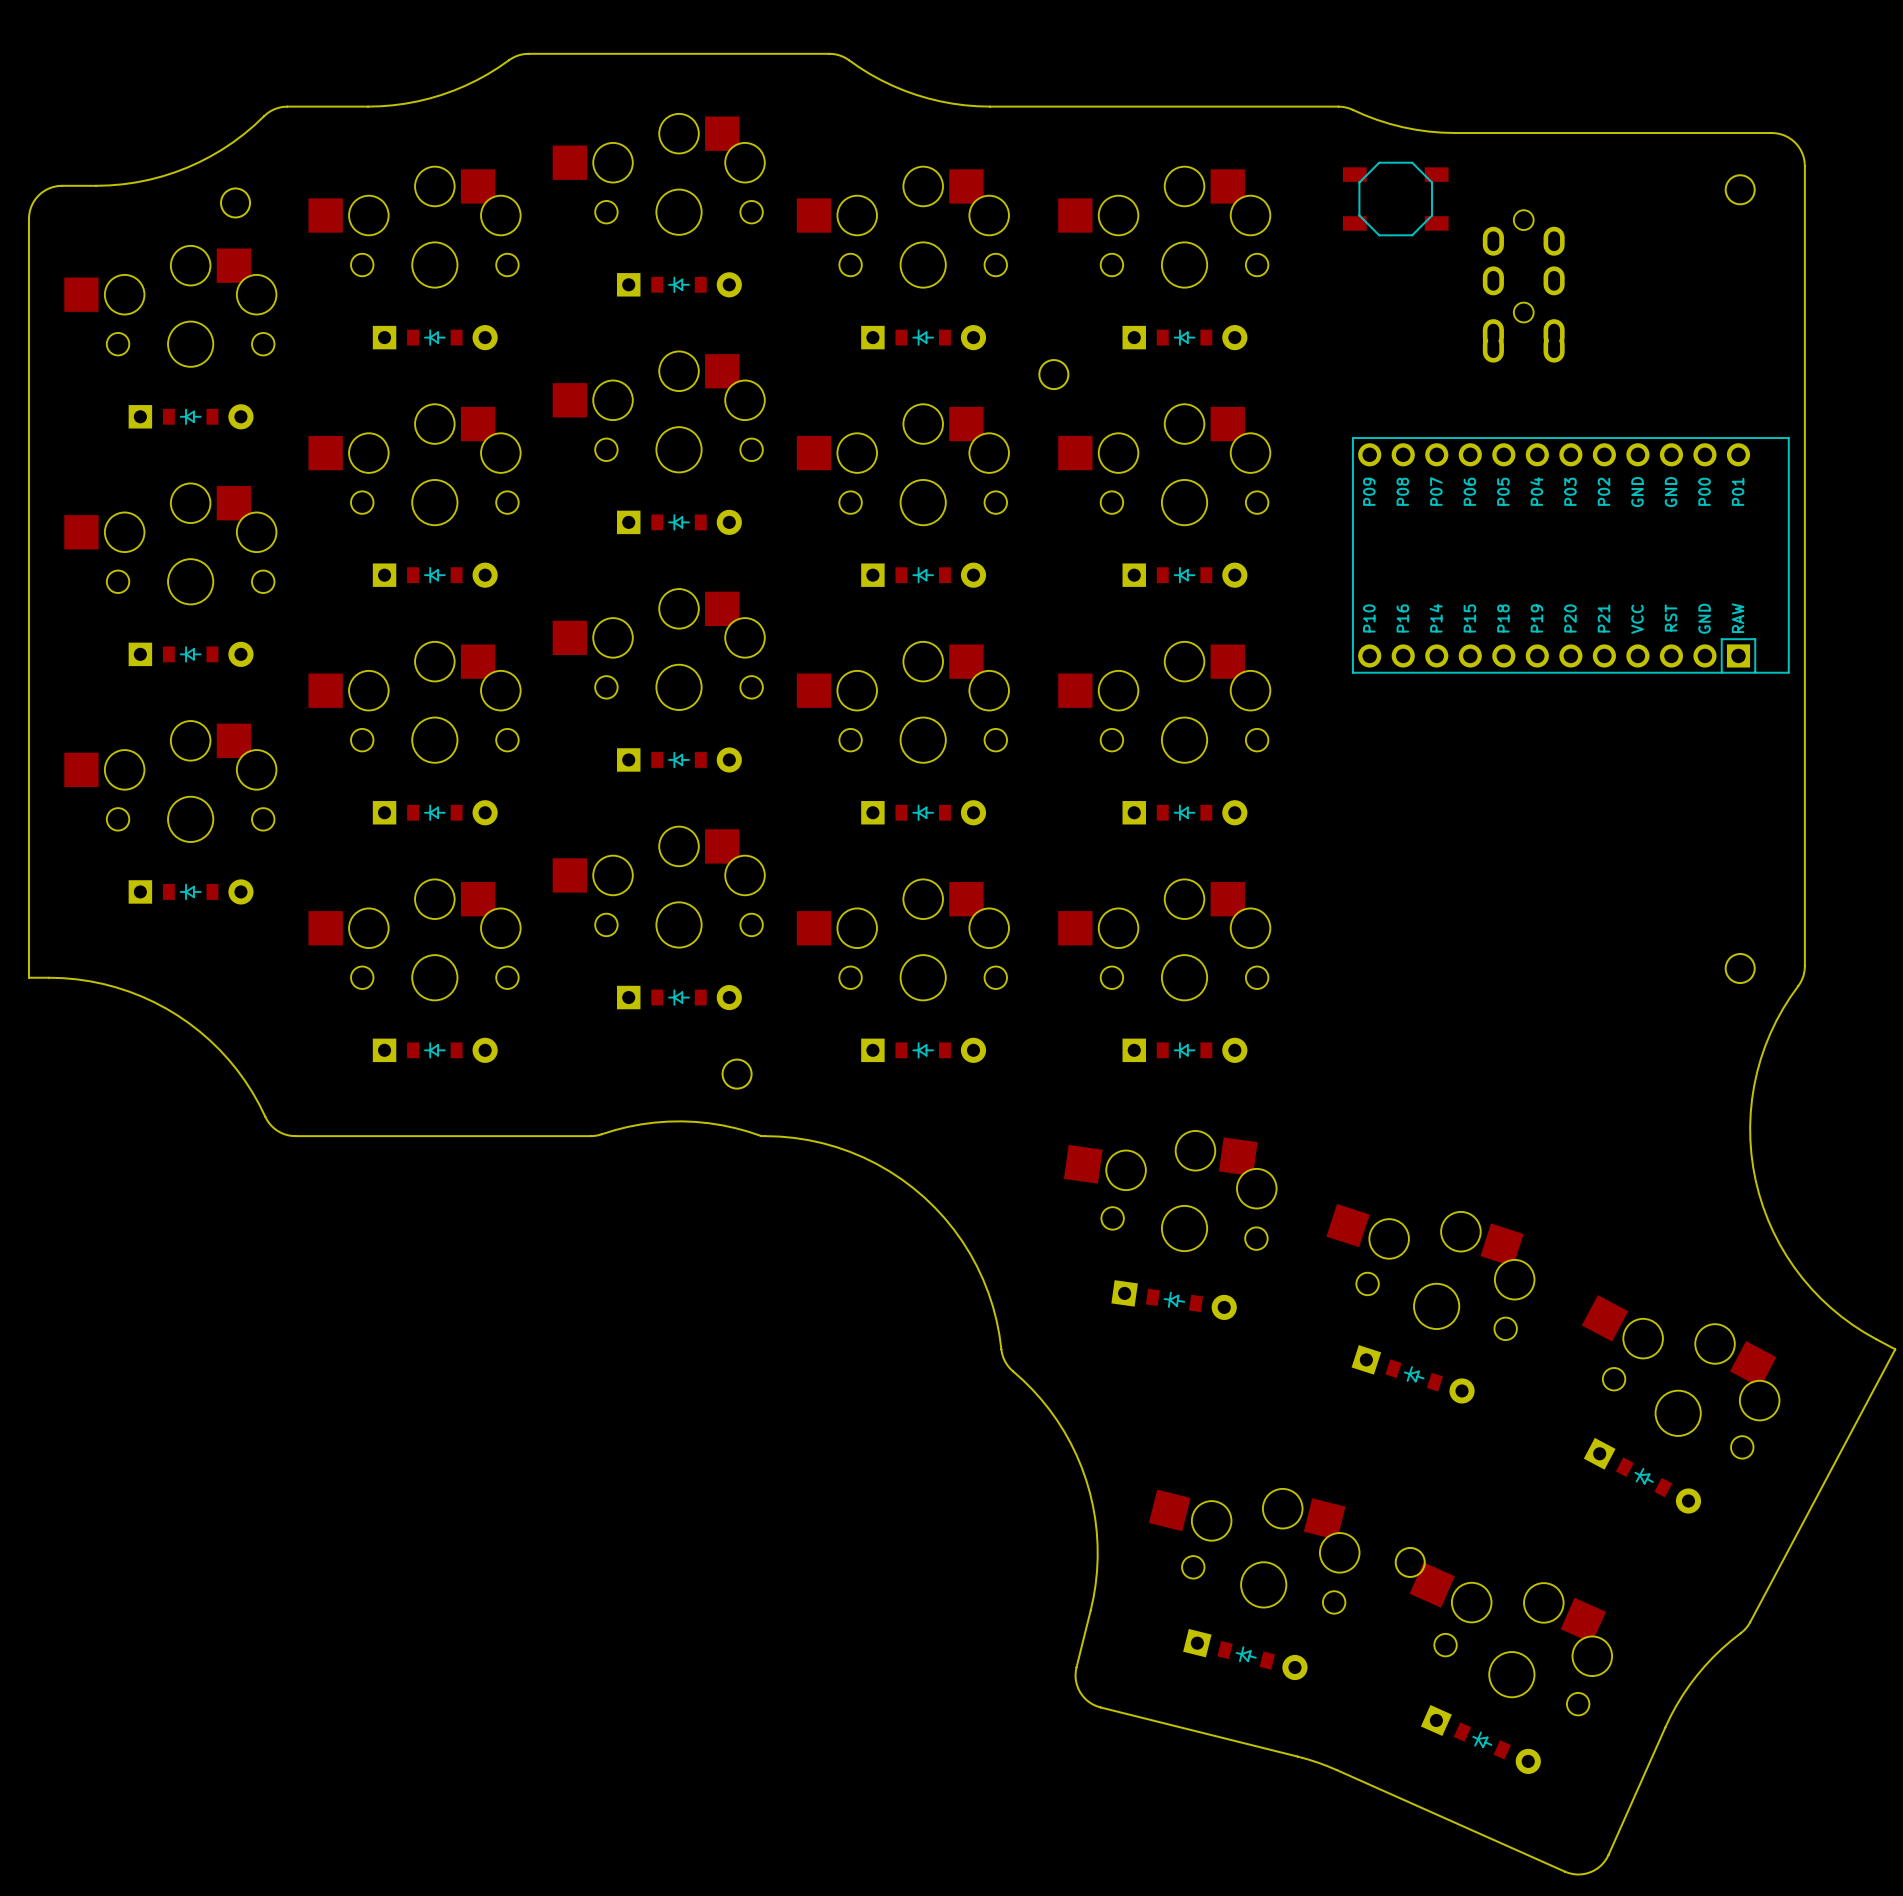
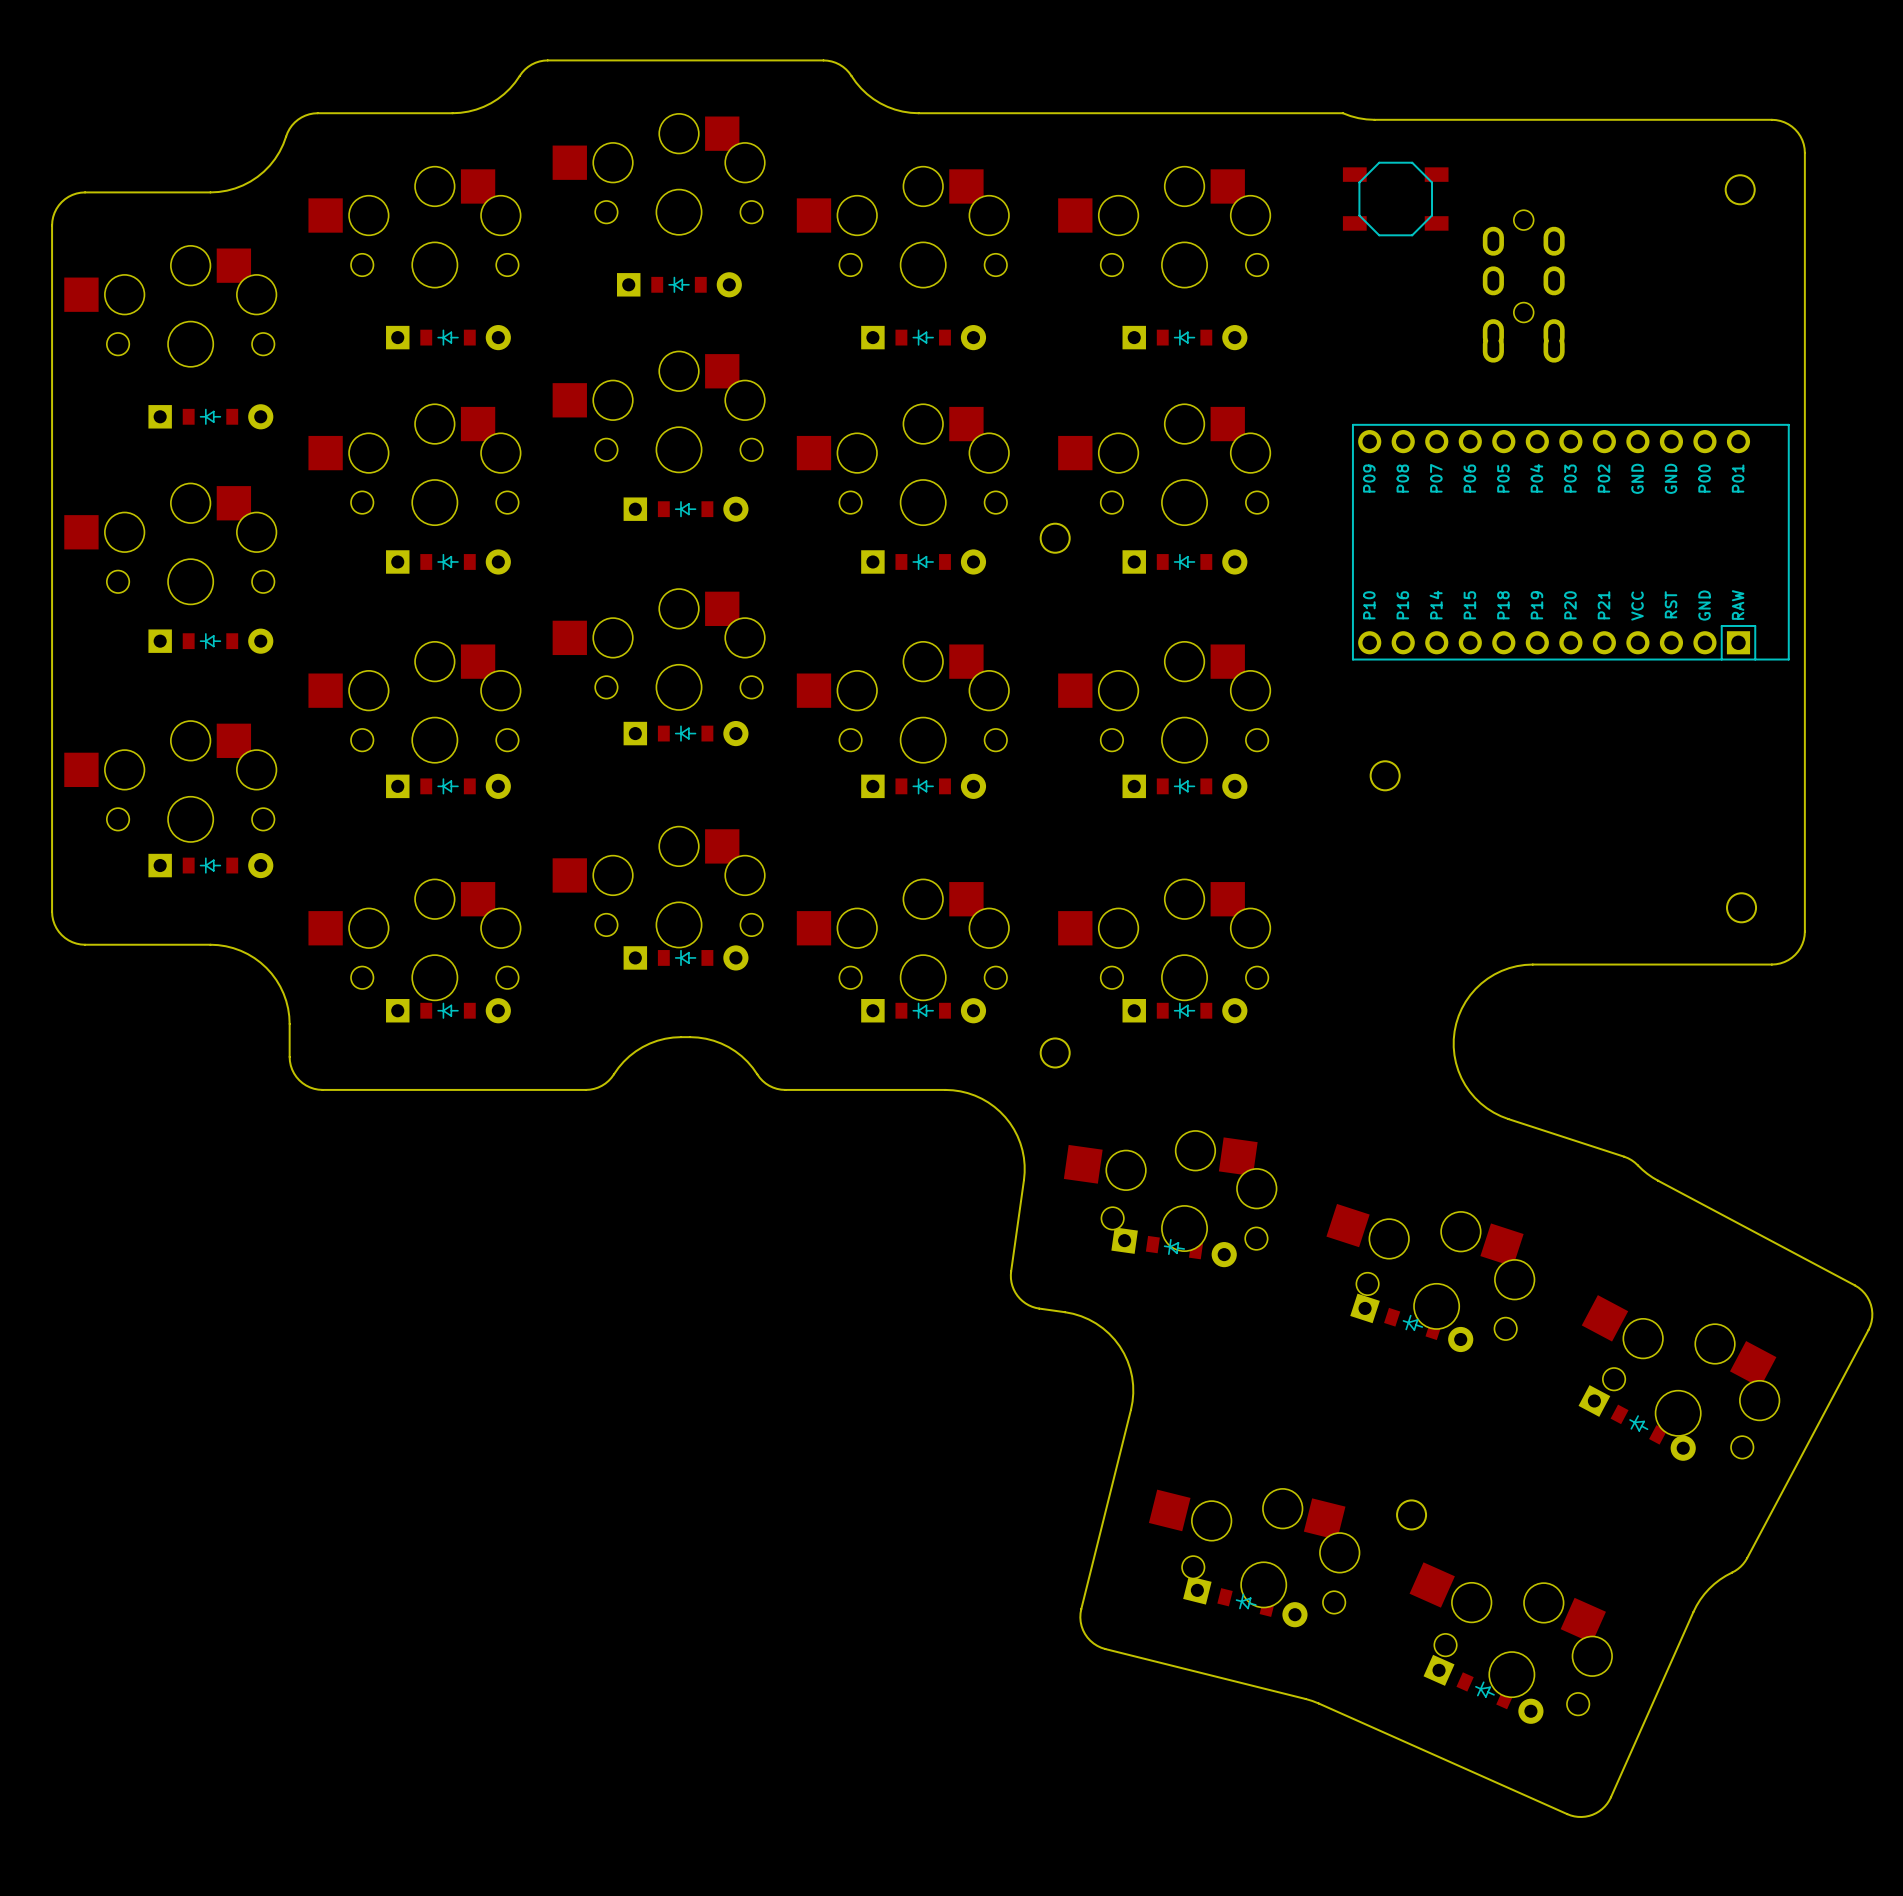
board edge: (1804, 166) (1802, 153) (1795, 142) (1788, 137) (1776, 133) (1441, 132) (1402, 127) (1377, 119) (1349, 108) (1338, 106) (977, 106) (940, 101) (903, 90) (870, 74) (843, 56) (832, 54) (528, 53) (515, 56) (465, 85) (417, 101) (380, 106) (278, 107) (267, 113) (244, 134) (222, 149) (186, 167) (135, 182) (109, 185) (53, 186) (38, 195) (30, 210) (28, 977) (62, 978) (103, 983) (141, 996) (177, 1015) (199, 1031) (219, 1049) (245, 1081) (269, 1123) (277, 1130) (287, 1135) (590, 1136) (641, 1124) (668, 1121) (695, 1121) (735, 1128) (761, 1136) (794, 1137) (822, 1143) (863, 1157) (889, 1171) (924, 1197) (944, 1218) (962, 1241) (976, 1266) (988, 1292) (1005, 1361) (1049, 1409) (1070, 1443) (1081, 1467) (1092, 1505) (1097, 1558) (1093, 1597) (1075, 1671) (1076, 1684) (1082, 1695) (1092, 1704) (1100, 1707) (1297, 1756) -> (1804, 166) (1804, 148) (1800, 136) (1791, 126) (1776, 120) (1374, 119) (1358, 118) (1342, 113) (918, 113) (894, 109) (880, 103) (861, 88) (843, 66) (827, 60) (547, 60) (535, 62) (528, 66) (509, 88) (497, 99) (483, 106) (468, 111) (317, 113) (305, 115) (292, 125) (279, 151) (269, 165) (250, 181) (235, 188) (210, 192) (80, 192) (68, 196) (58, 205) (53, 216) (52, 225) (52, 911) (54, 924) (61, 935) (72, 942) (85, 944) (218, 945) (240, 950) (254, 958) (266, 967) (276, 979) (286, 1000) (289, 1016) (289, 1056) (292, 1069) (302, 1083) (314, 1088) (590, 1089) (605, 1083) (629, 1056) (649, 1043) (673, 1037) (698, 1037) (713, 1040) (735, 1051) (747, 1061) (762, 1080) (777, 1088) (945, 1089) (974, 1095) (994, 1106) (1014, 1129) (1022, 1150) (1023, 1180)
round board edge: [220, 187, 252, 219] -> none
part position: (435, 337) -> (448, 337)
round board edge position: (1053, 374) -> (1055, 538)
part position: (191, 416) -> (210, 416)
part position: (679, 522) -> (686, 509)
part position: (1570, 555) -> (1570, 542)
part position: (435, 575) -> (448, 561)
part position: (923, 575) -> (923, 561)
part position: (1184, 575) -> (1184, 561)
part position: (191, 654) -> (210, 641)
part position: (679, 759) -> (686, 733)
round board edge: none -> [1369, 760, 1401, 792]
part position: (435, 812) -> (448, 786)
part position: (923, 812) -> (923, 786)
part position: (1184, 812) -> (1184, 786)
part position: (191, 891) -> (210, 865)
board edge: (1804, 931) (1803, 976) (1770, 1033) (1760, 1058) (1754, 1085) (1750, 1112) (1750, 1140) (1755, 1180) (1763, 1207) (1773, 1232) (1786, 1256) (1802, 1278) (1821, 1298) (1841, 1316) (1864, 1332) (1895, 1349) (1748, 1625) (1713, 1657) (1697, 1675) (1676, 1705) (1665, 1727) -> (1804, 931) (1802, 944) (1795, 954) (1788, 960) (1776, 964) (1532, 964) (1509, 968) (1487, 978) (1470, 995) (1458, 1015) (1453, 1039) (1454, 1055) (1461, 1078) (1474, 1097) (1493, 1112) (1508, 1119)
round board edge position: (1740, 968) -> (1741, 907)
part position: (679, 997) -> (686, 957)
round board edge: none -> [1039, 1037, 1071, 1069]
part position: (435, 1050) -> (448, 1010)
part position: (923, 1050) -> (923, 1010)
part position: (1184, 1050) -> (1184, 1010)
round board edge: [721, 1058, 753, 1090] -> none
board edge: none -> (1508, 1119) (1627, 1158) (1658, 1180)
board edge: none -> (1023, 1180) (1010, 1275) (1015, 1292) (1022, 1301) (1032, 1306) (1073, 1313) (1088, 1319) (1102, 1328) (1119, 1346) (1127, 1360) (1132, 1376) (1133, 1393) (1130, 1409) (1080, 1613) (1081, 1626) (1087, 1637) (1097, 1645) (1105, 1649) (1312, 1700) (1567, 1814) (1581, 1816) (1595, 1813) (1609, 1800) (1696, 1605) (1714, 1584) (1738, 1568) (1745, 1561) (1868, 1329) (1872, 1317) (1869, 1300) (1858, 1287) (1658, 1180)
part position: (1174, 1300) -> (1174, 1247)
part position: (1413, 1374) -> (1411, 1322)
part position: (1642, 1475) -> (1637, 1422)
round board edge position: (1410, 1562) -> (1411, 1514)
part position: (1245, 1654) -> (1245, 1601)
board edge: (1665, 1727) (1606, 1858) (1594, 1870) (1581, 1874) (1565, 1871) (1336, 1770) (1297, 1756) -> none
part position: (1480, 1739) -> (1483, 1689)

